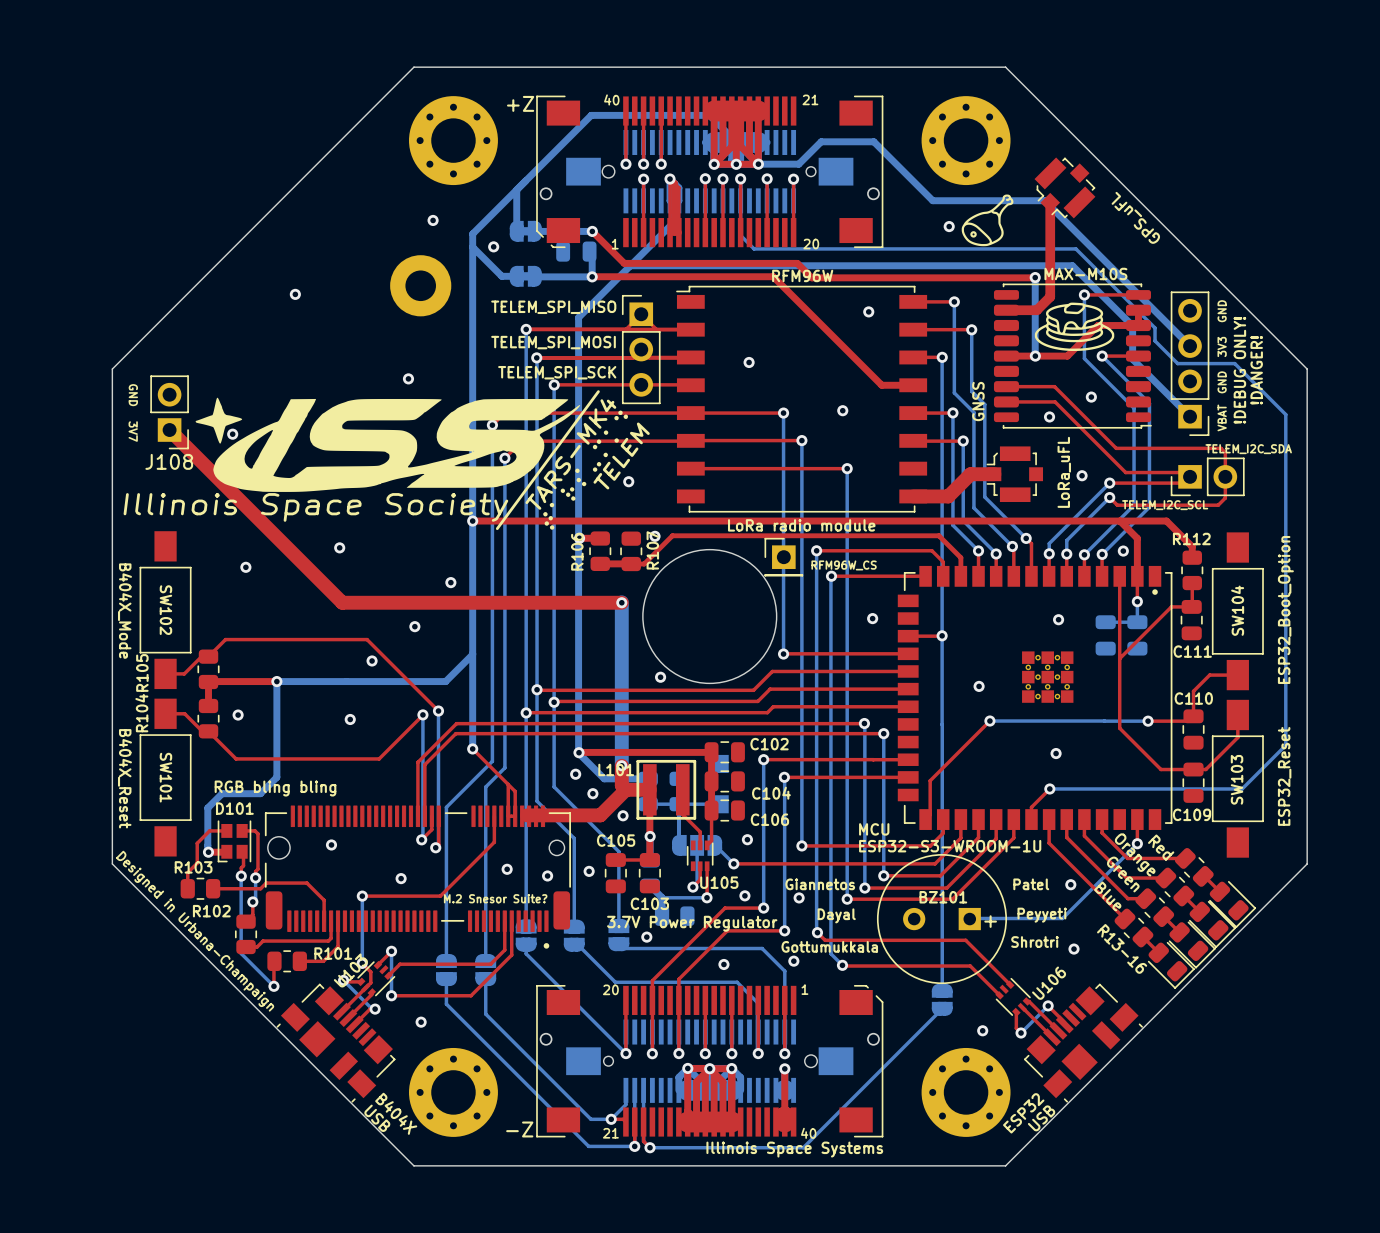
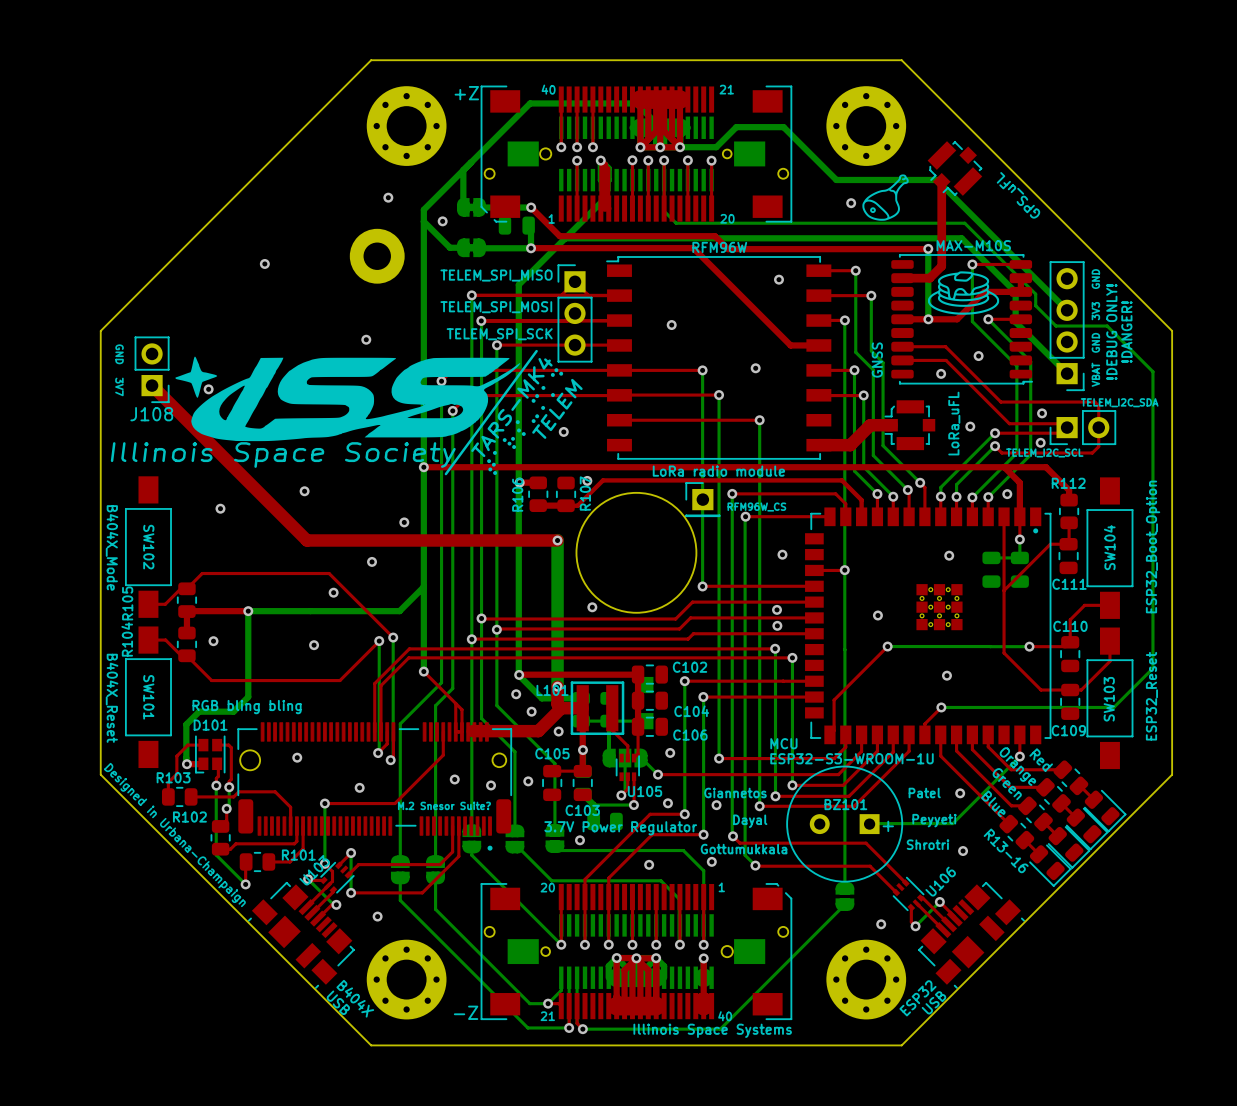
via: none -> (1042, 413)
via: none -> (1040, 442)
via: none -> (777, 609)
via: none -> (777, 625)

